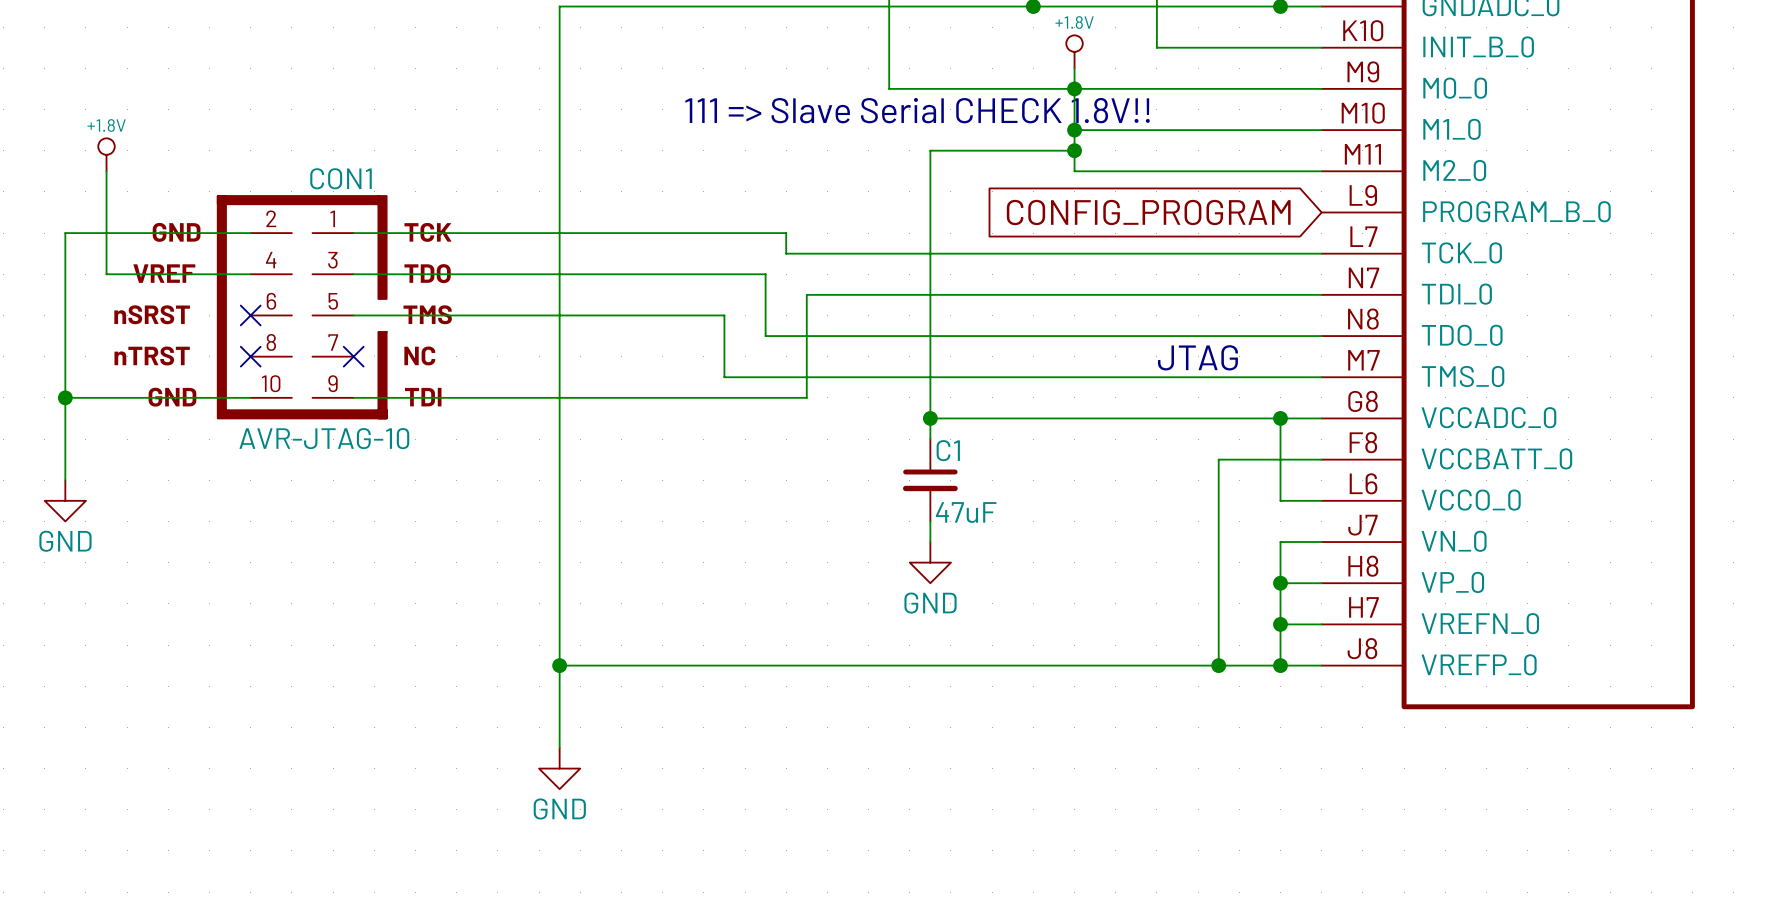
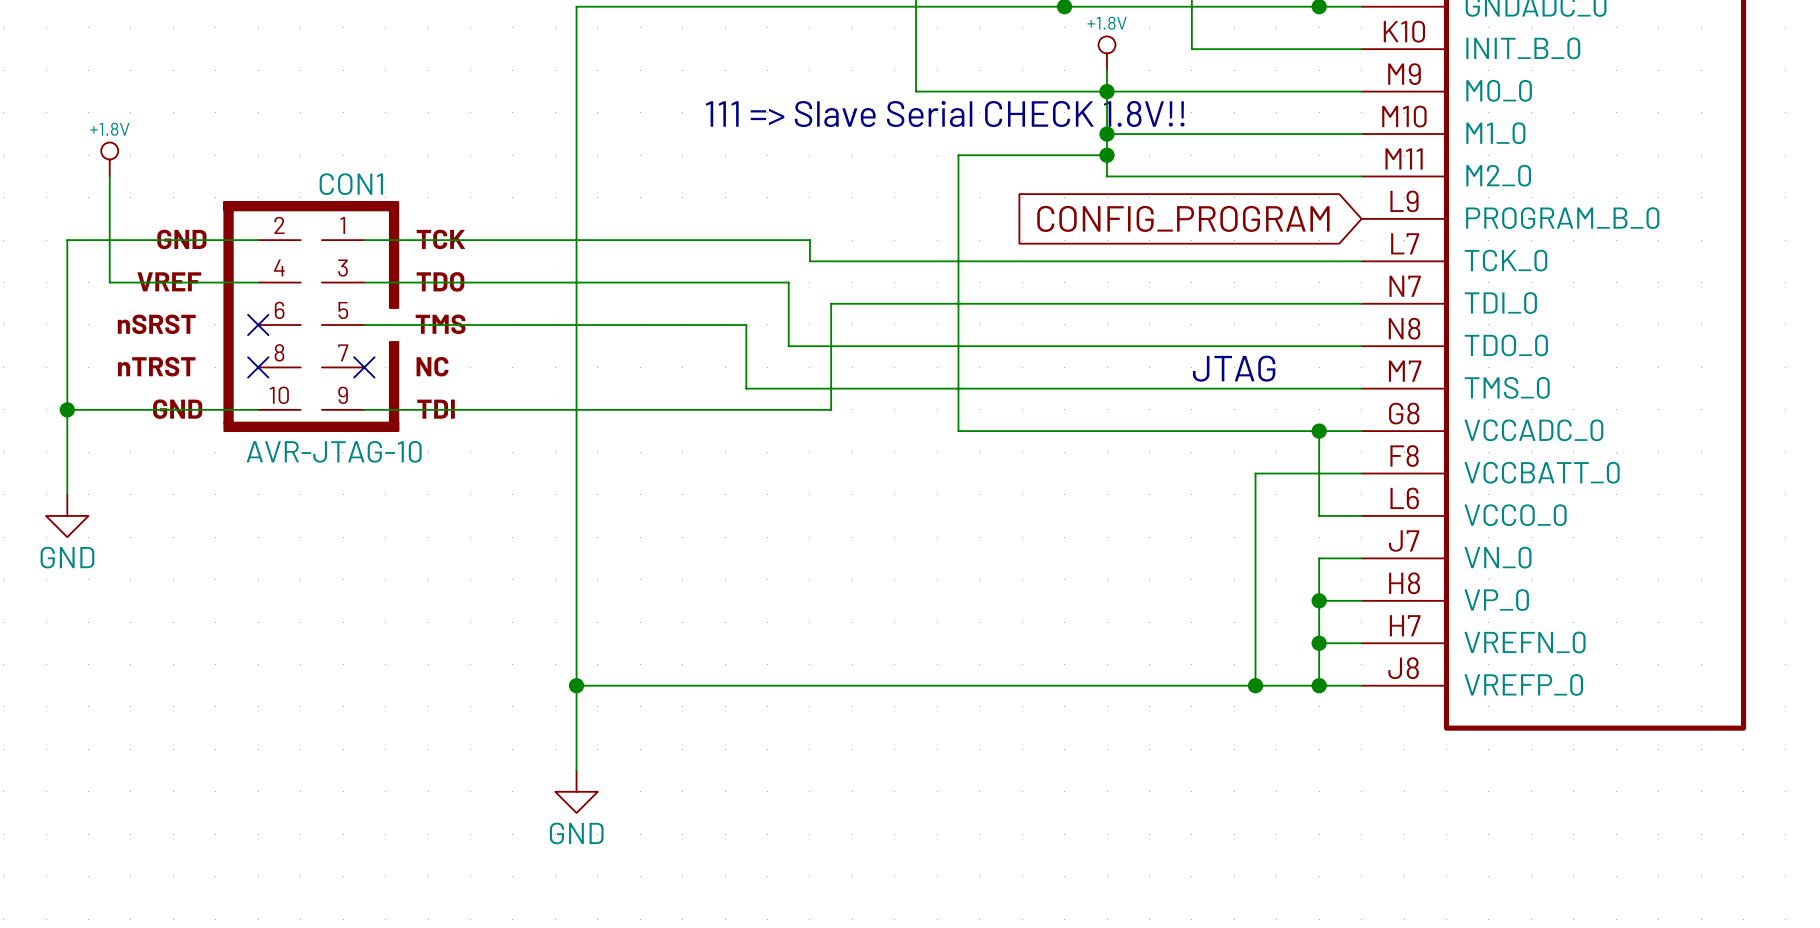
wire: (930, 418) (930, 439) -> none
junction: (930, 418) -> none
C1: 47uF (930, 480) -> none
wire: (930, 521) (930, 542) -> none
power symbol: GND (930, 562) -> none

